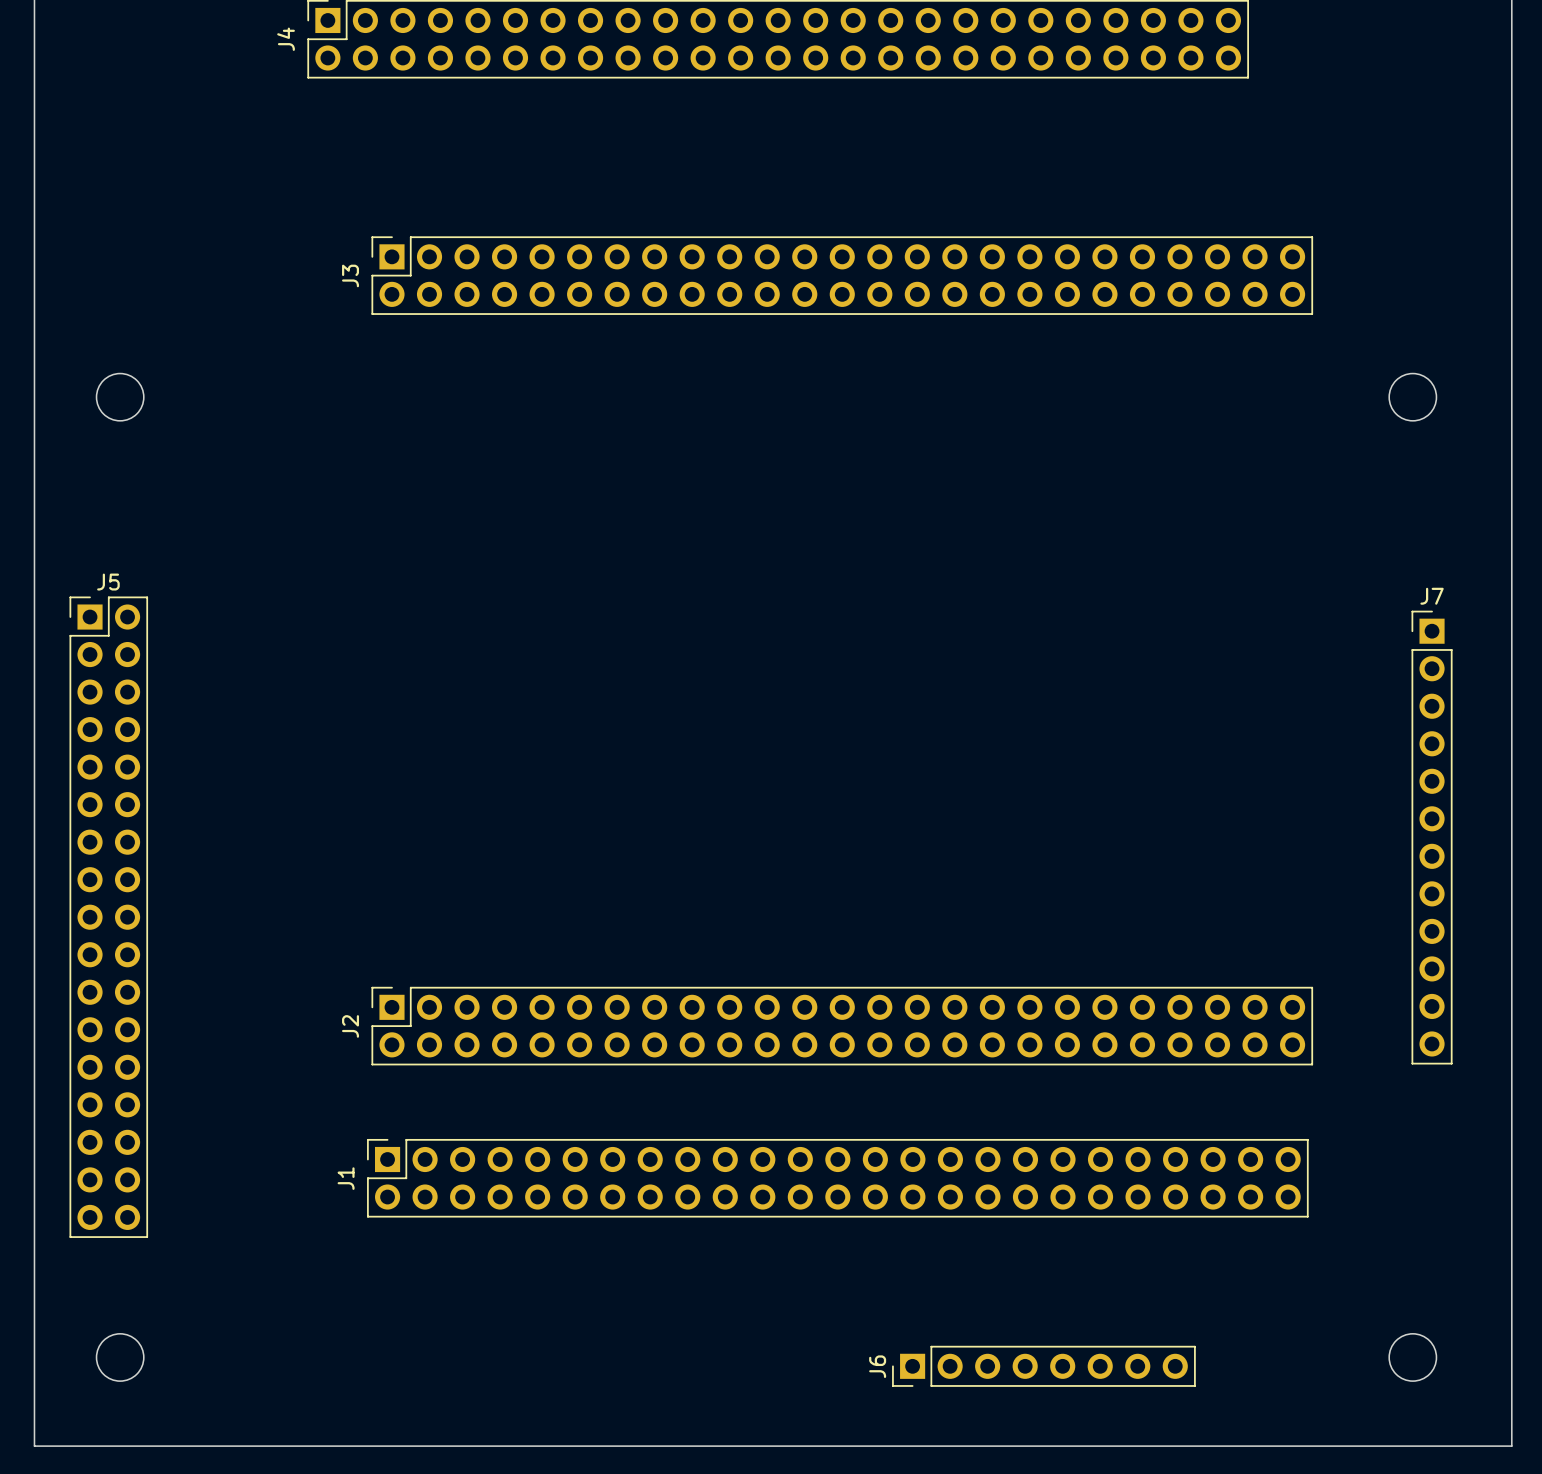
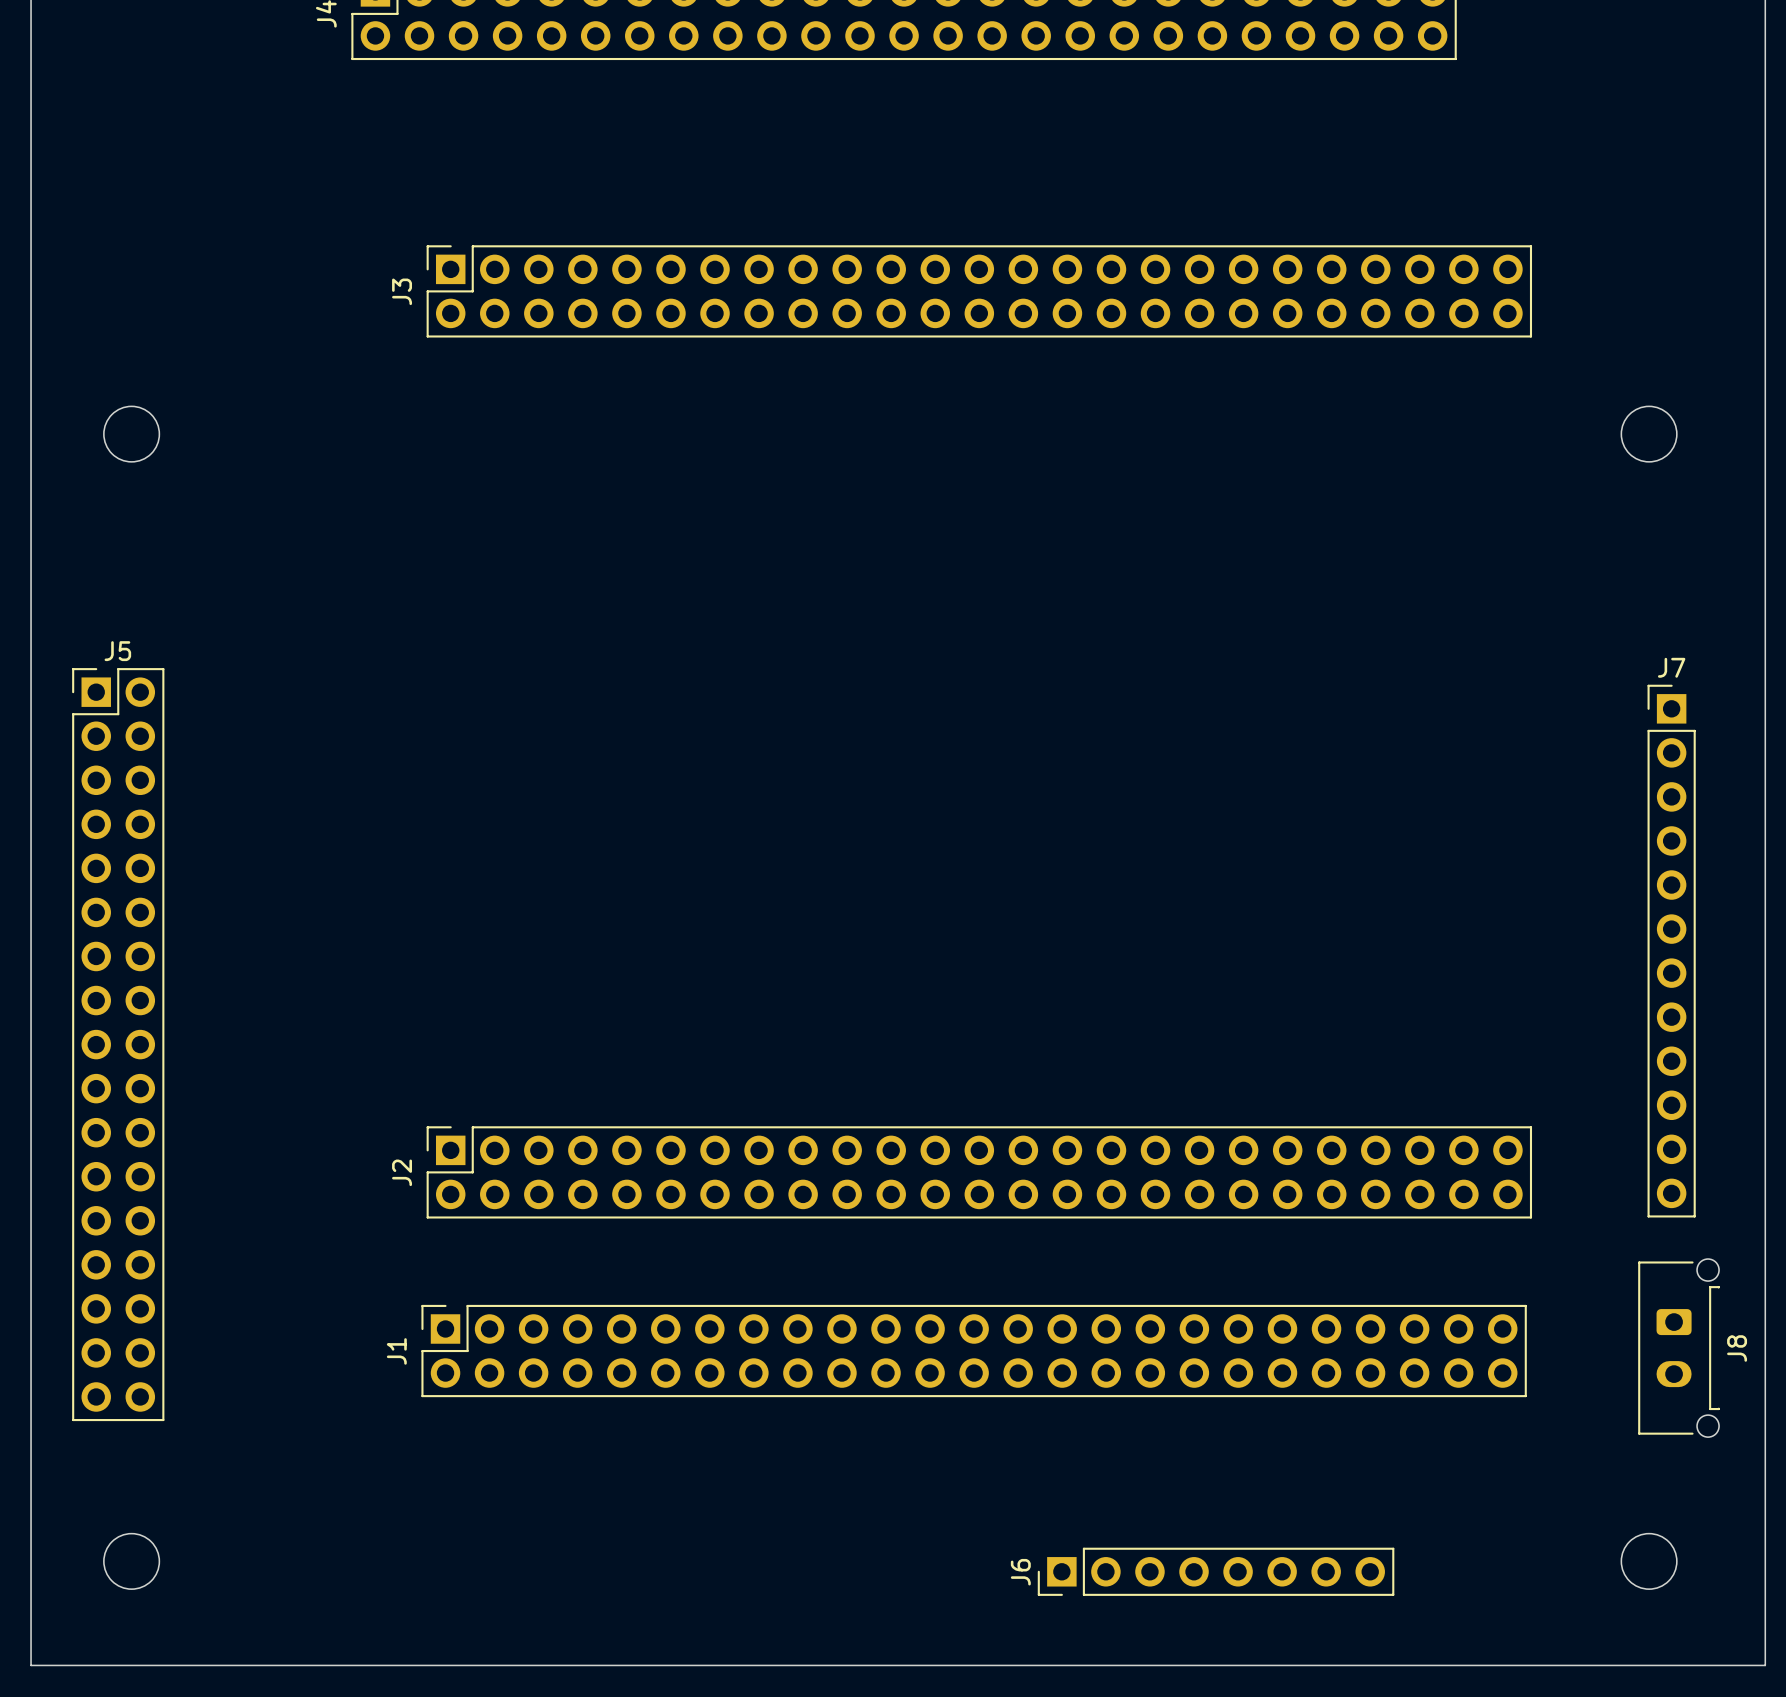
J8: none -> (1679, 1348)

